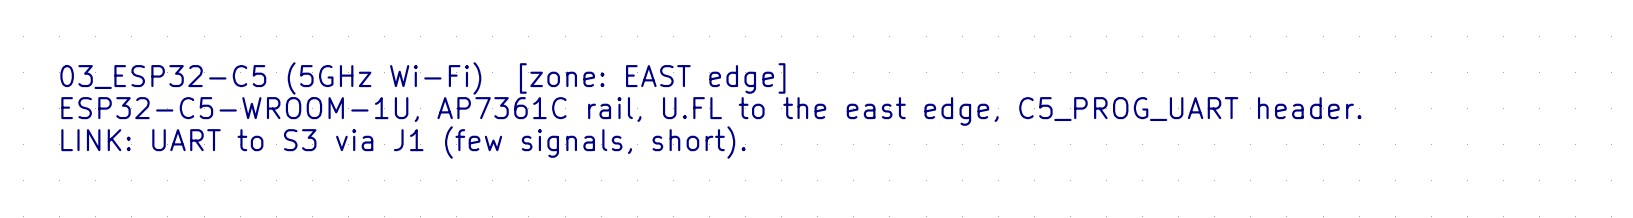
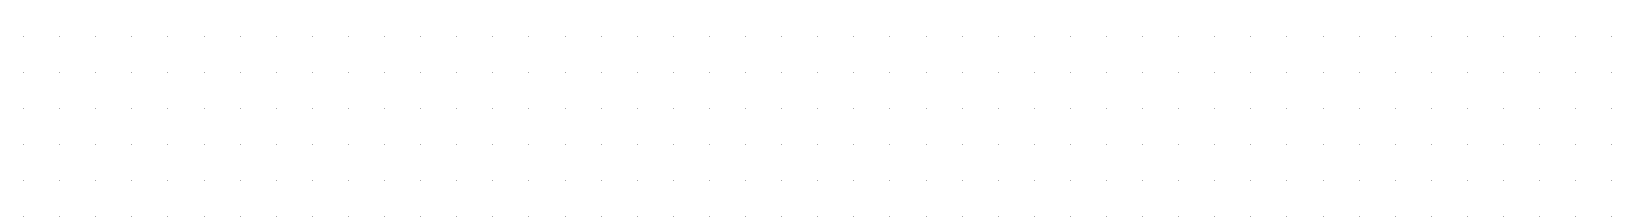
text: 03_ESP32-C5 (5GHz Wi-Fi) [zone: EAST edge] (422, 78) -> none
text: ESP32-C5-WROOM-1U, AP7361C rail, U.FL to the east edge, C5_PROG_UART header. (711, 111) -> none
text: LINK: UART to S3 via J1 (few signals, short). (403, 142) -> none

